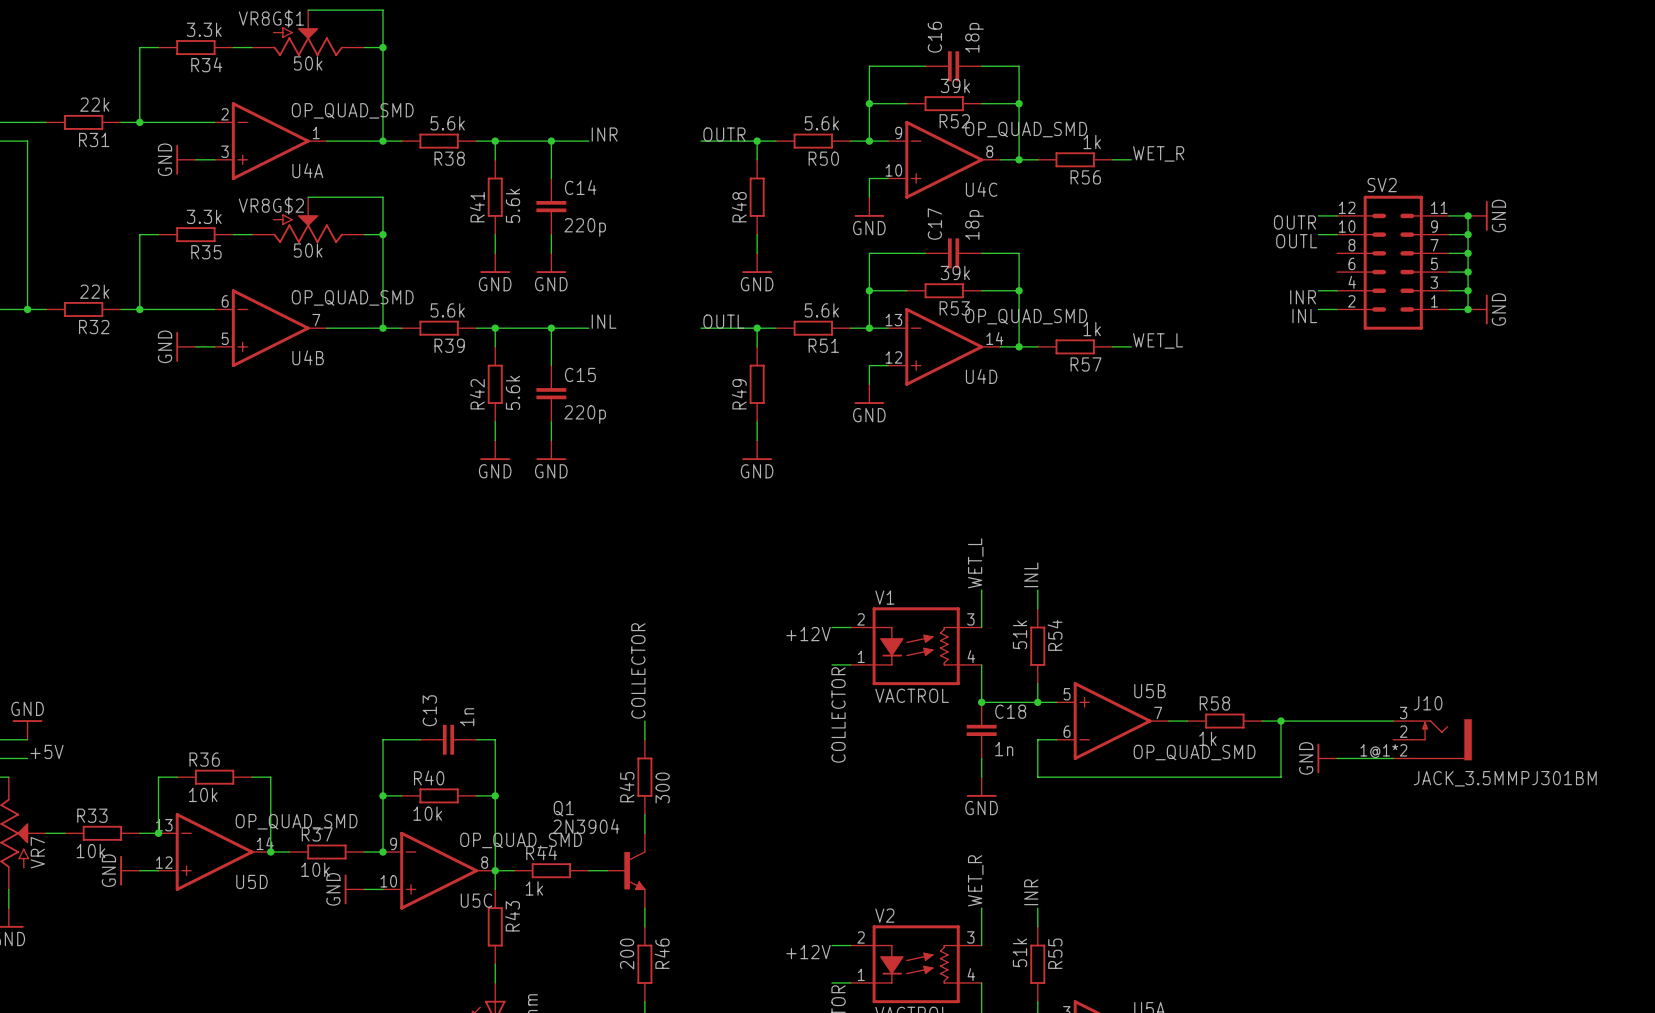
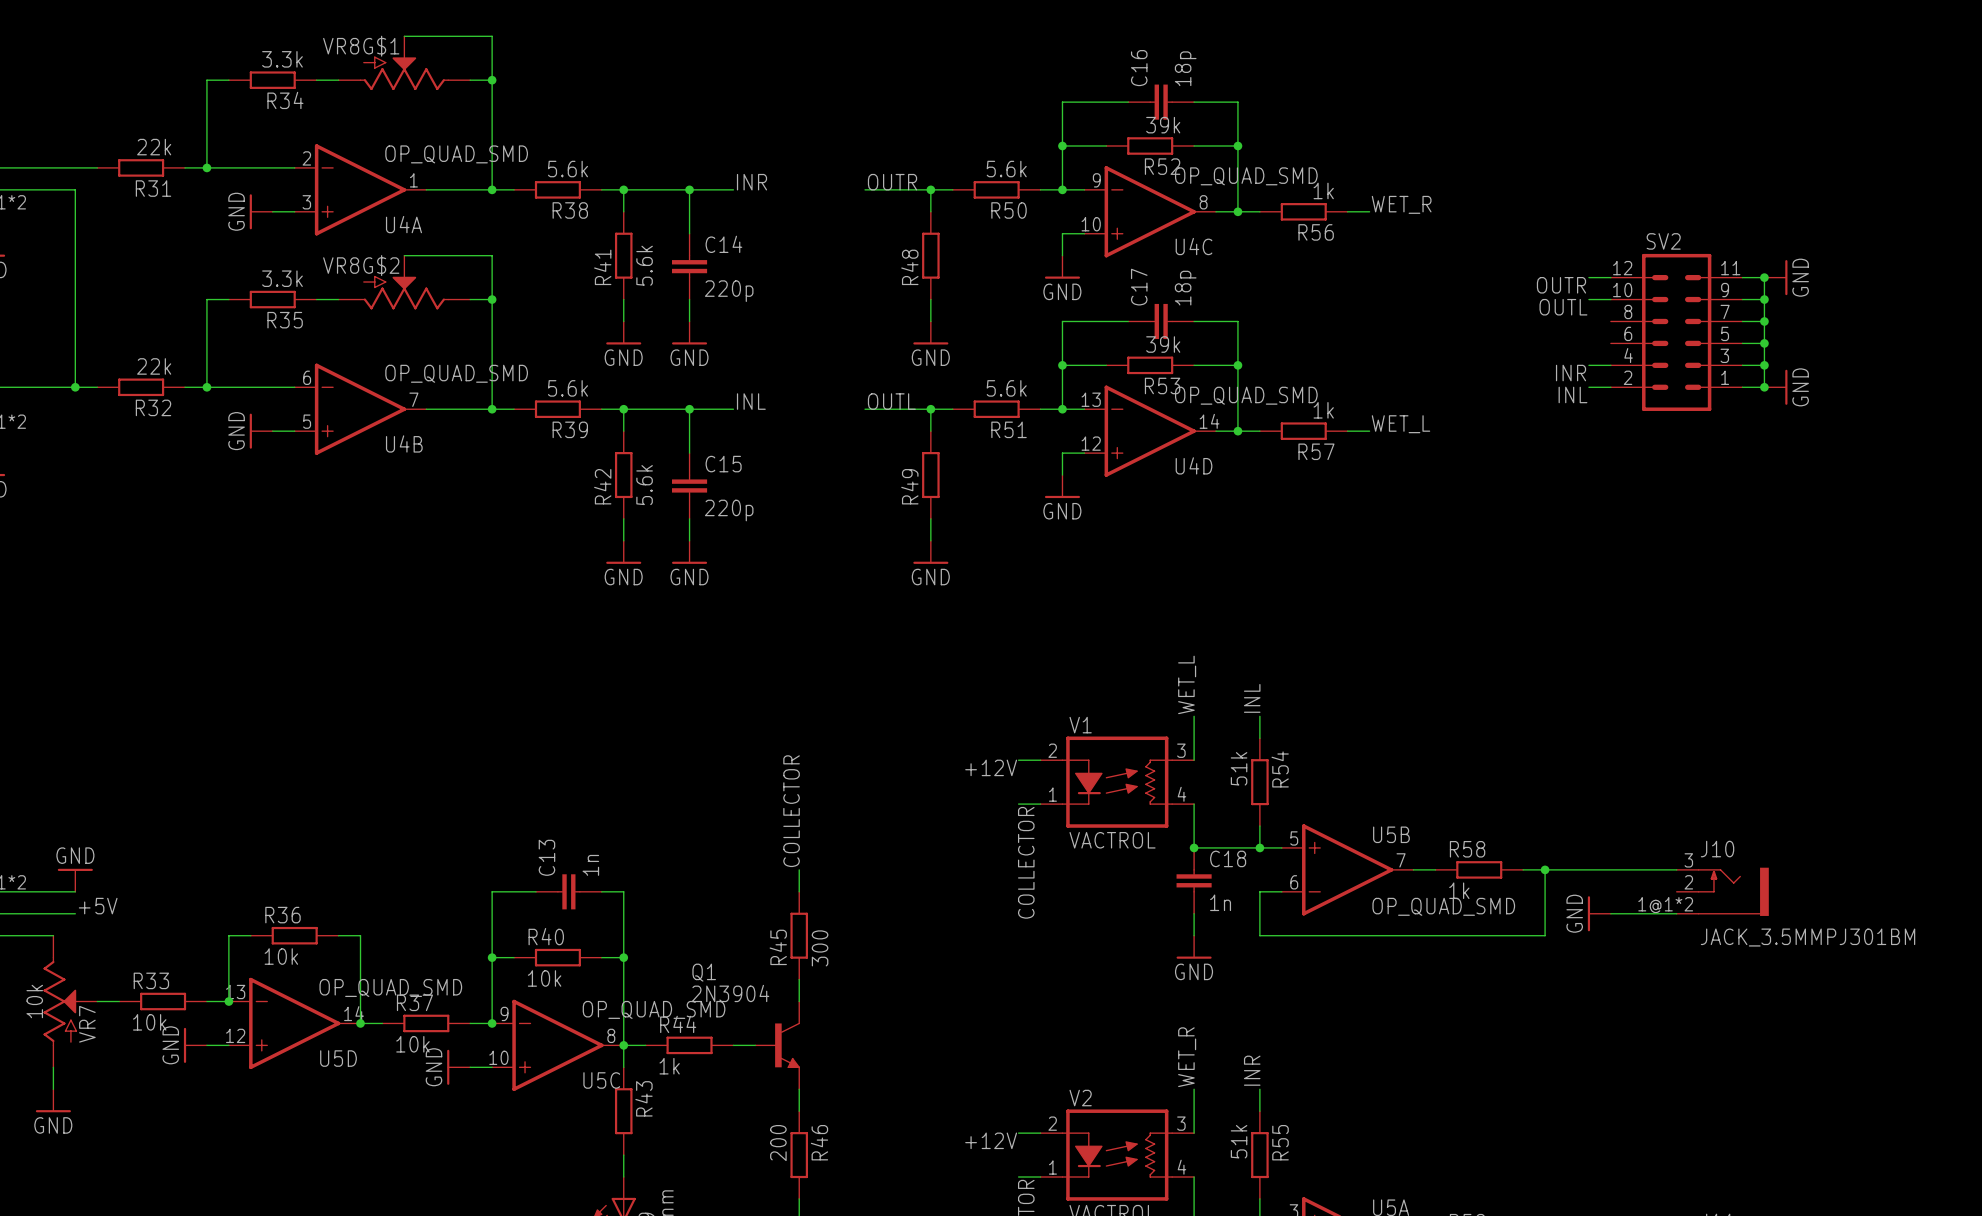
VR8G$1 value: 50k (308, 63) -> none
VR8G$2 value: 50k (308, 250) -> none

